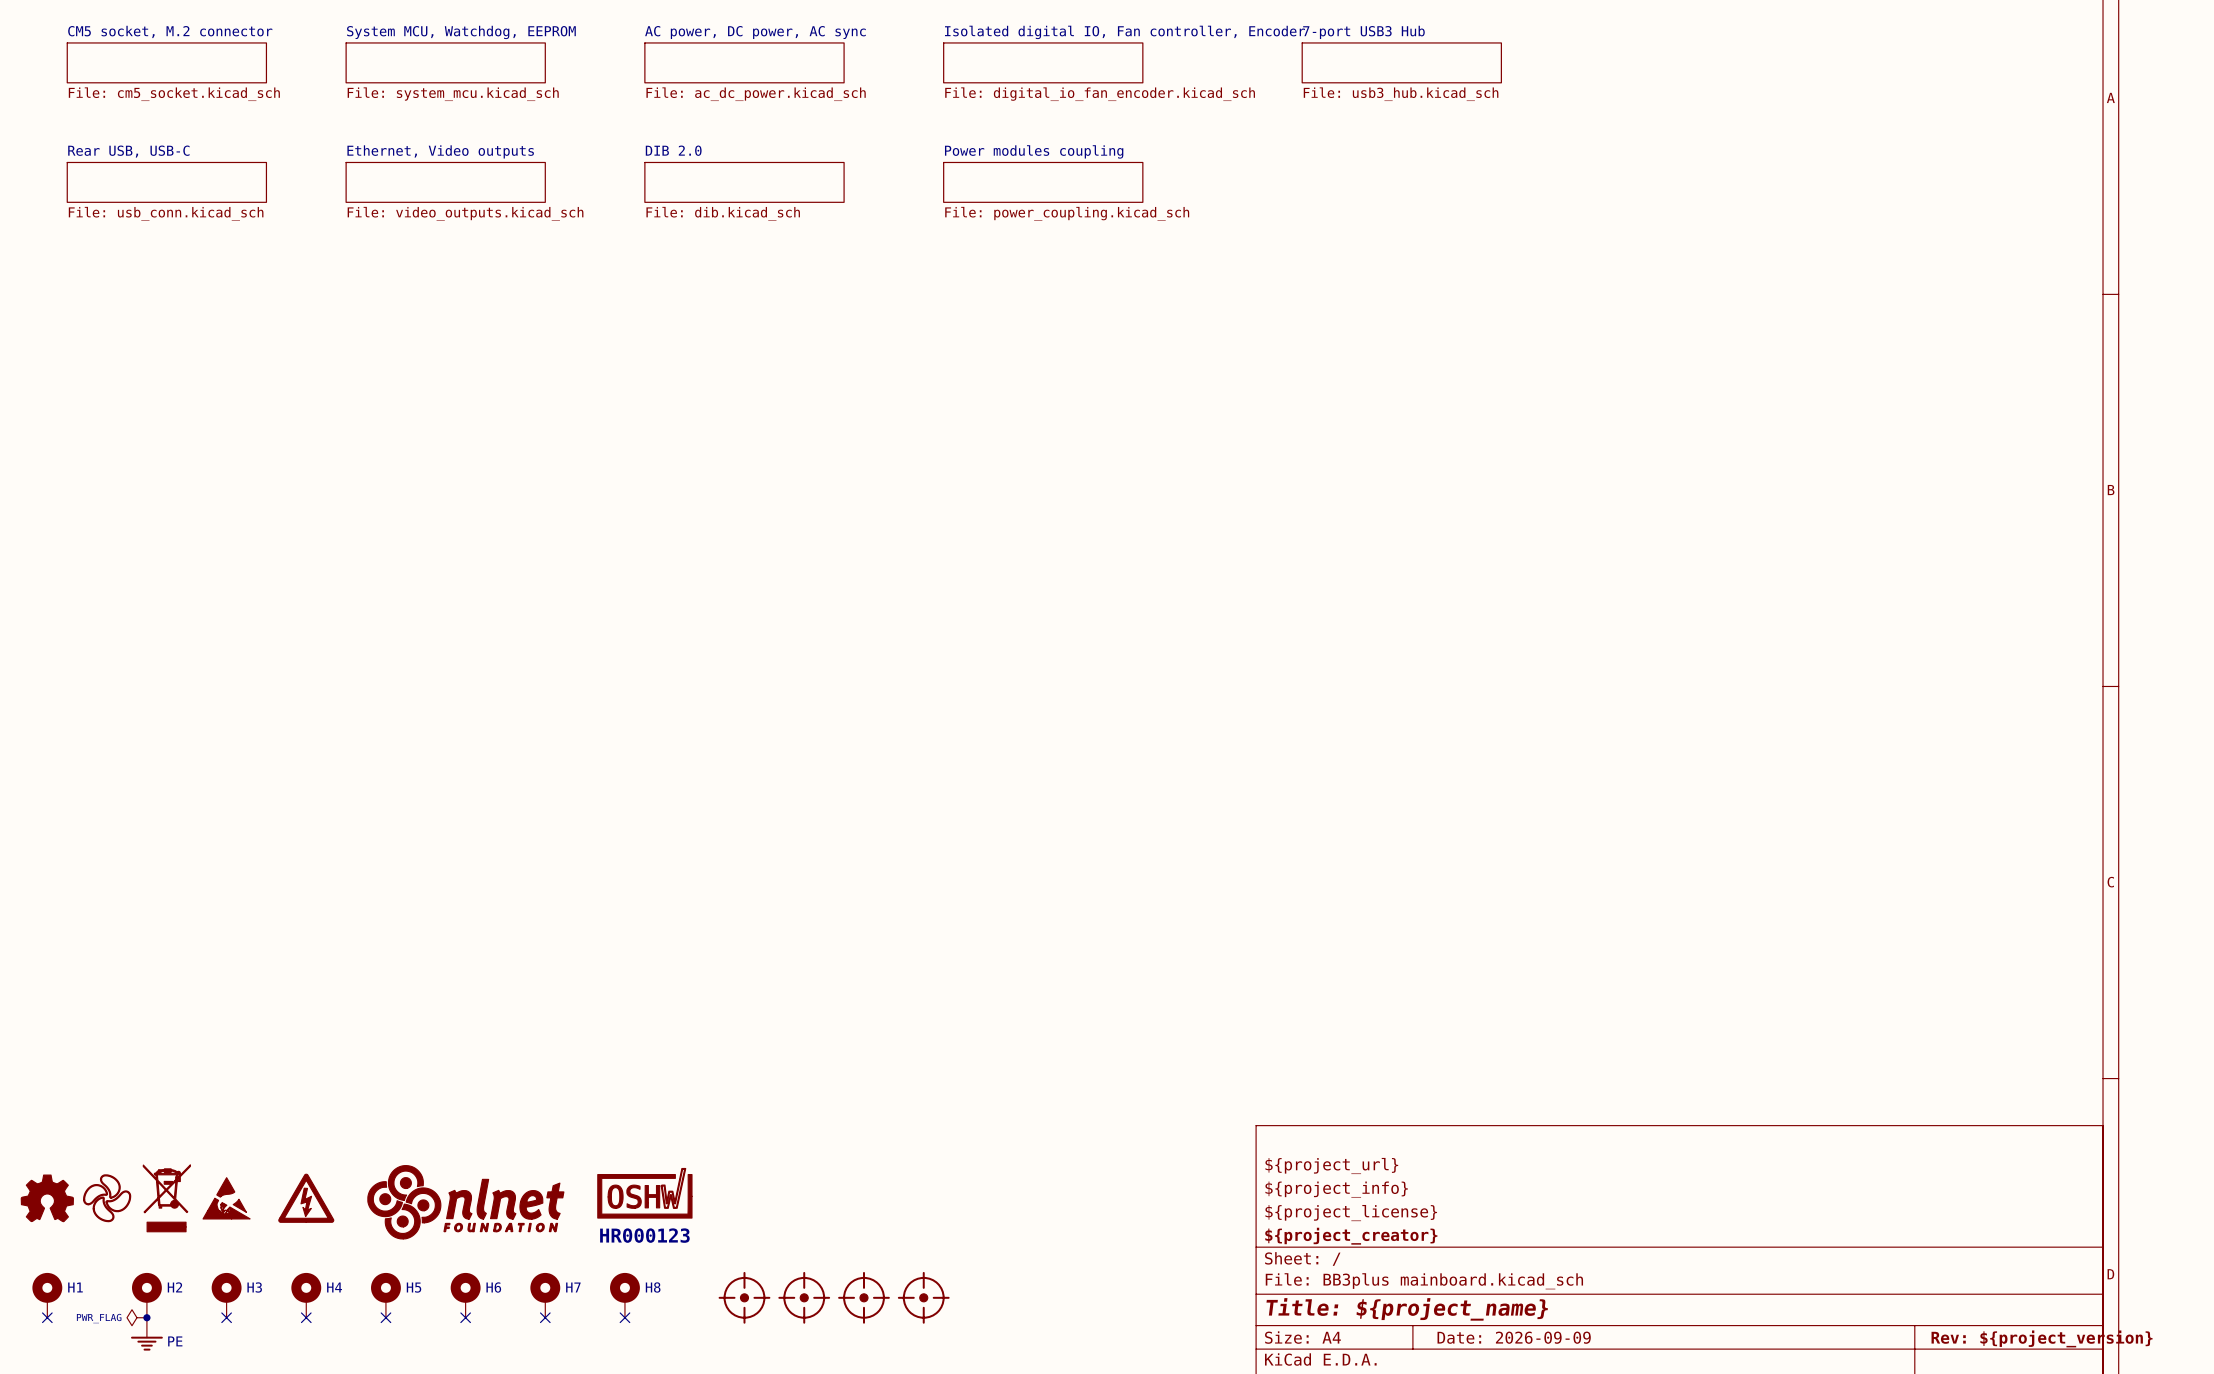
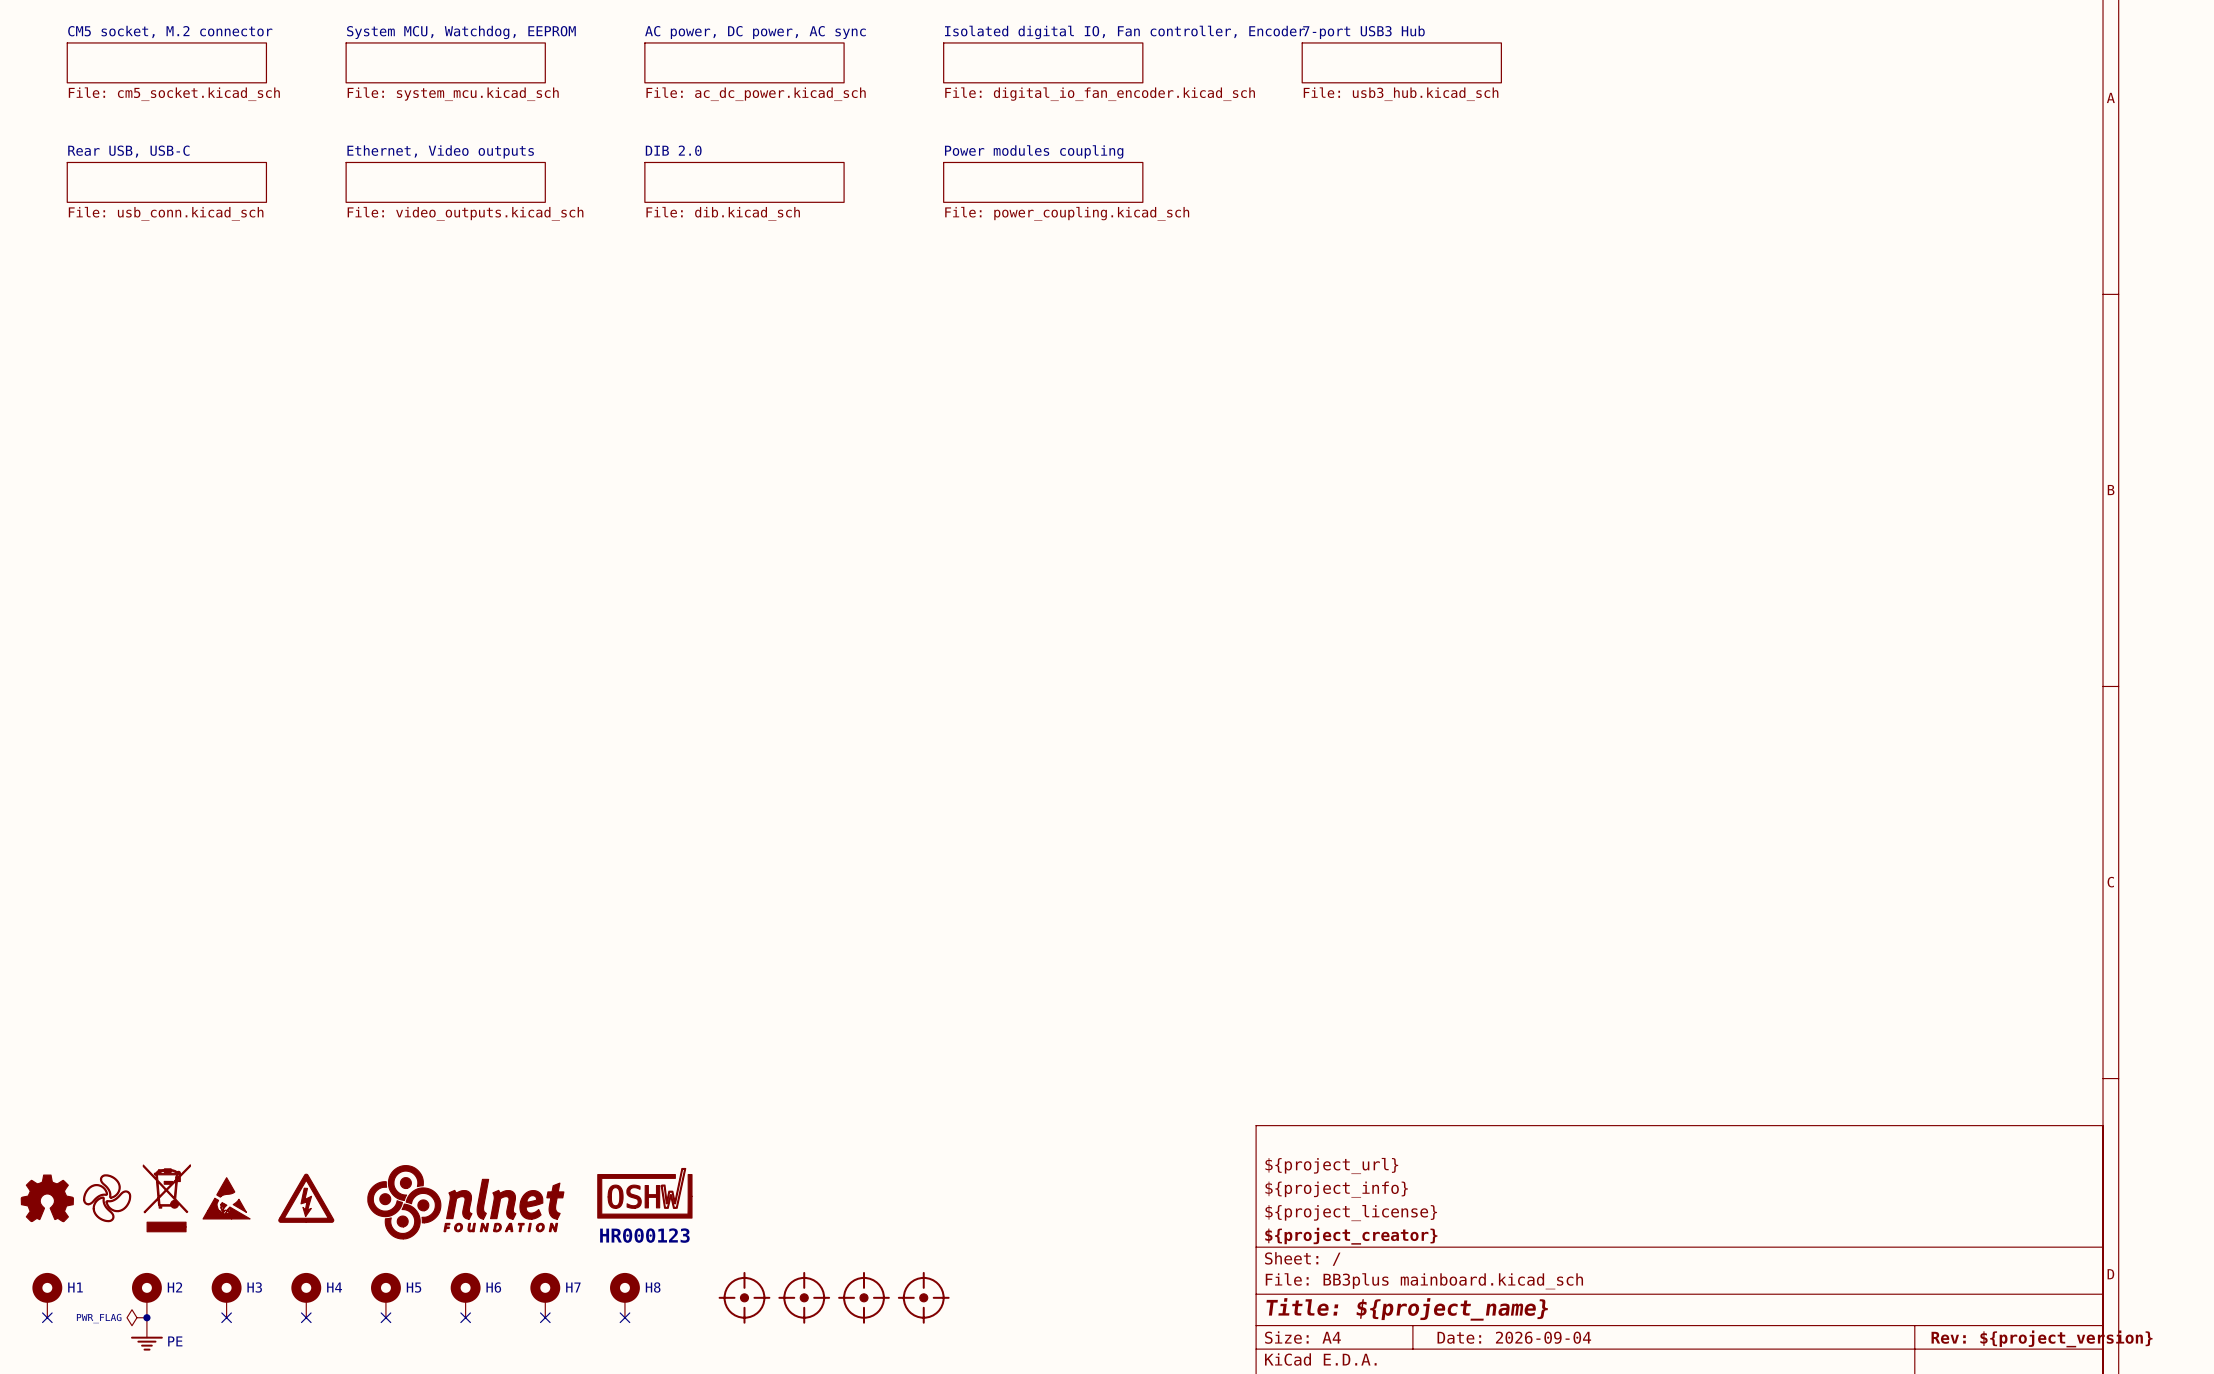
title block: Date: 2026-09-09 (1514, 1337) -> Date: 2026-09-04 (1514, 1337)

